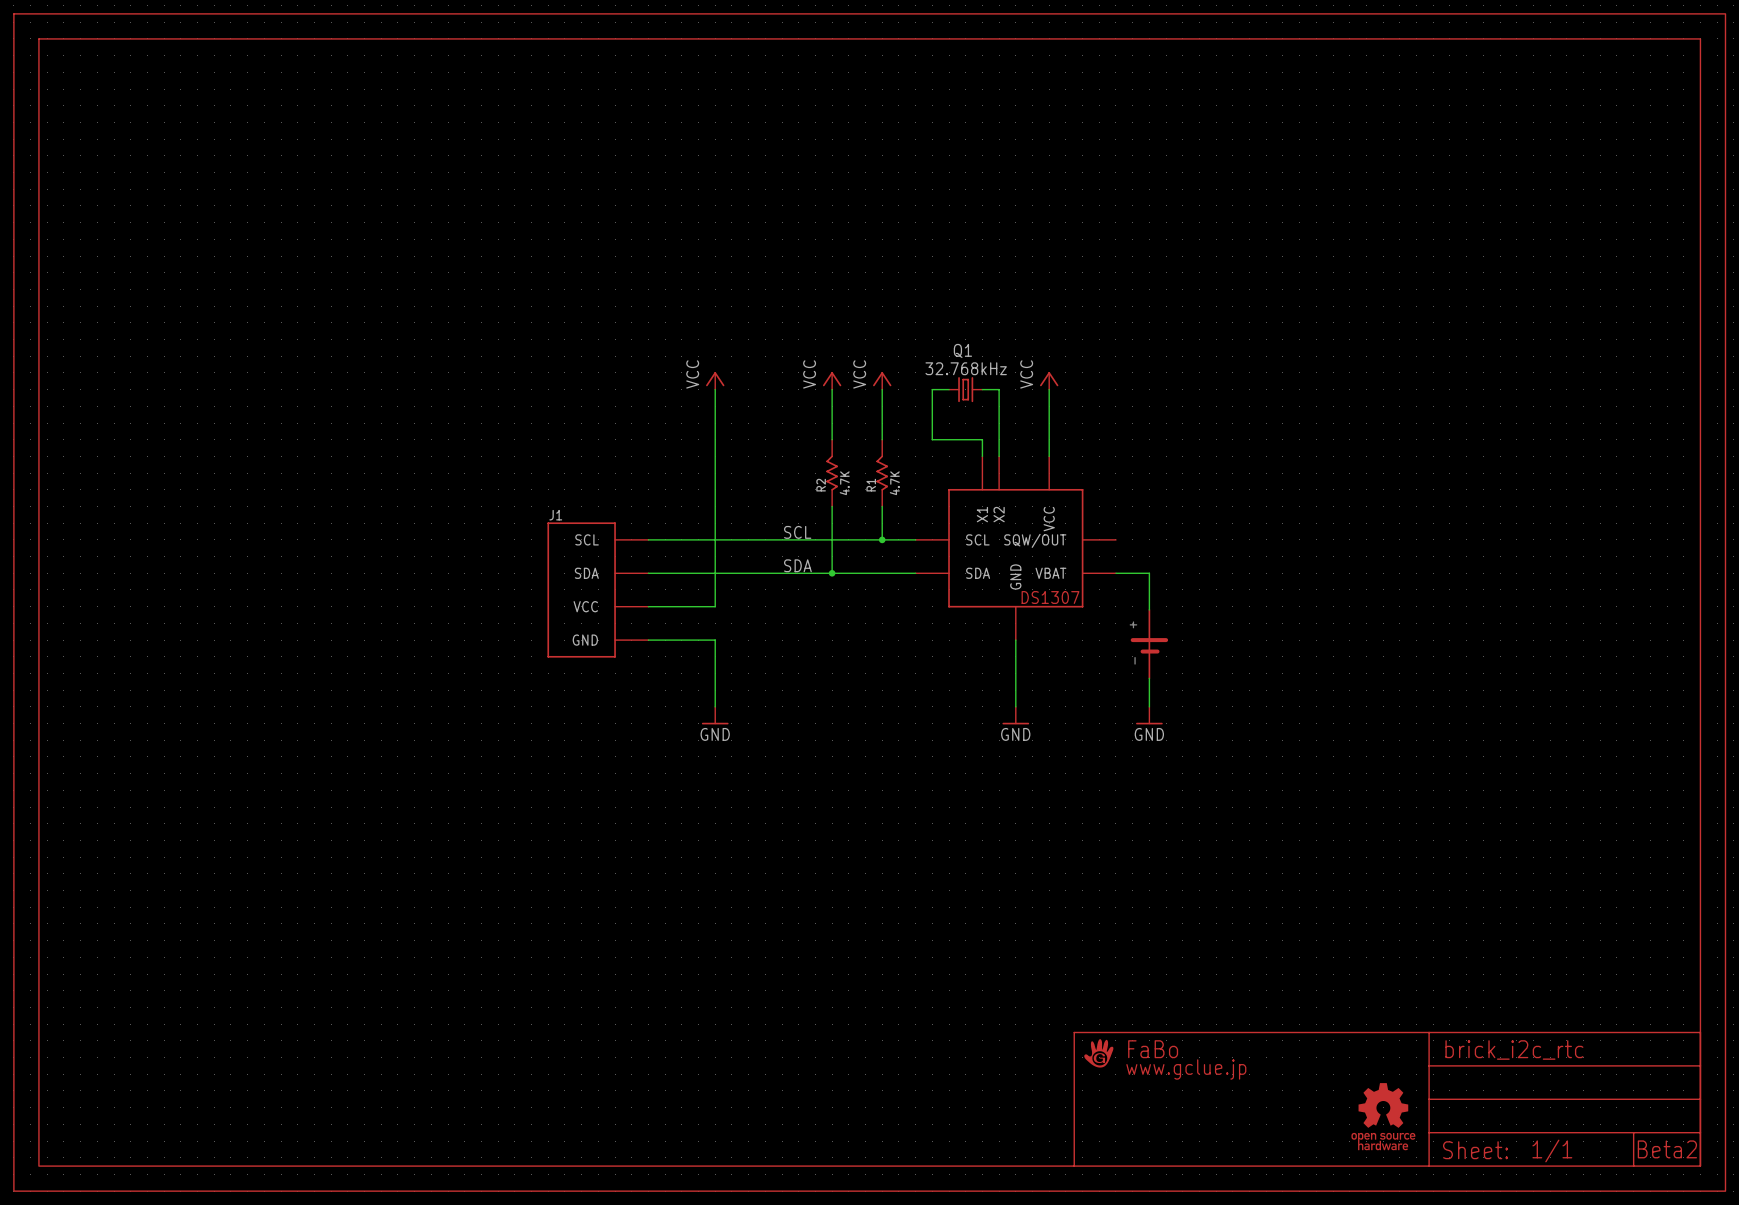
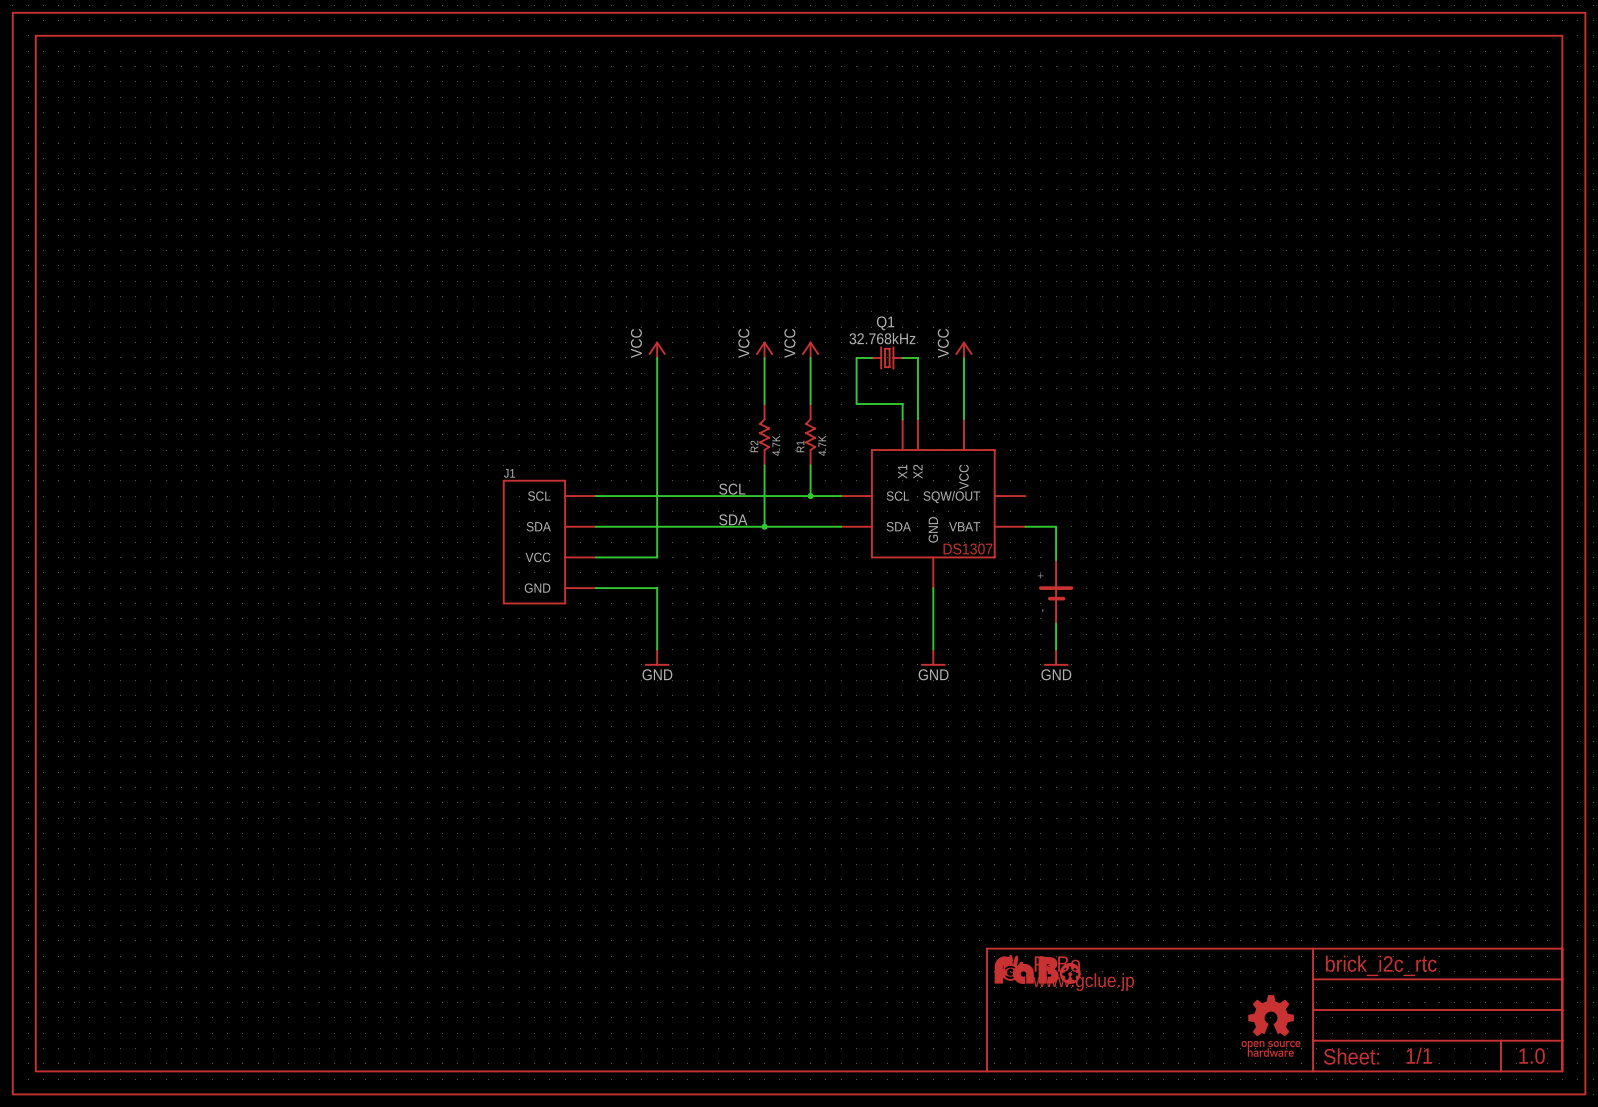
part: none -> (1037, 970)
text: Beta2 (1667, 1149) -> 1.0 (1532, 1056)

